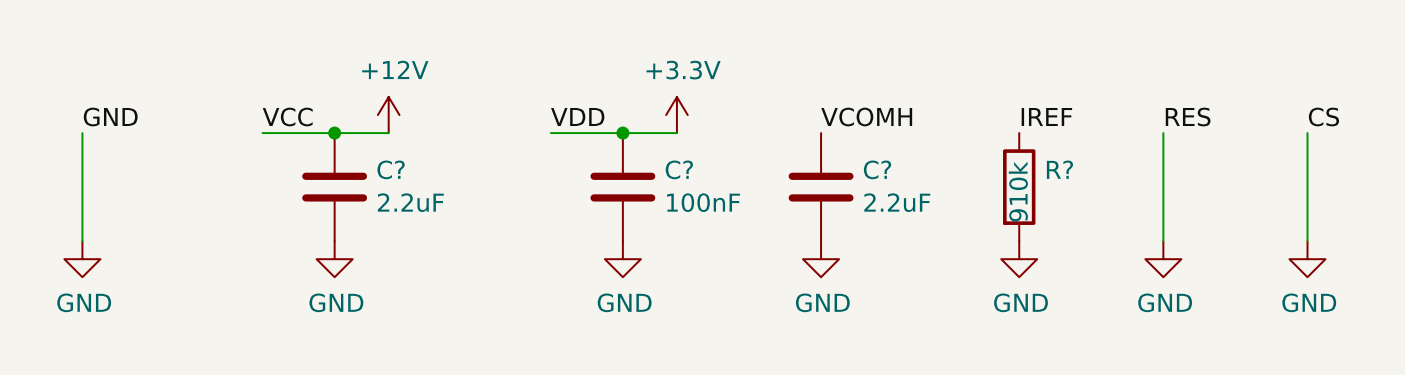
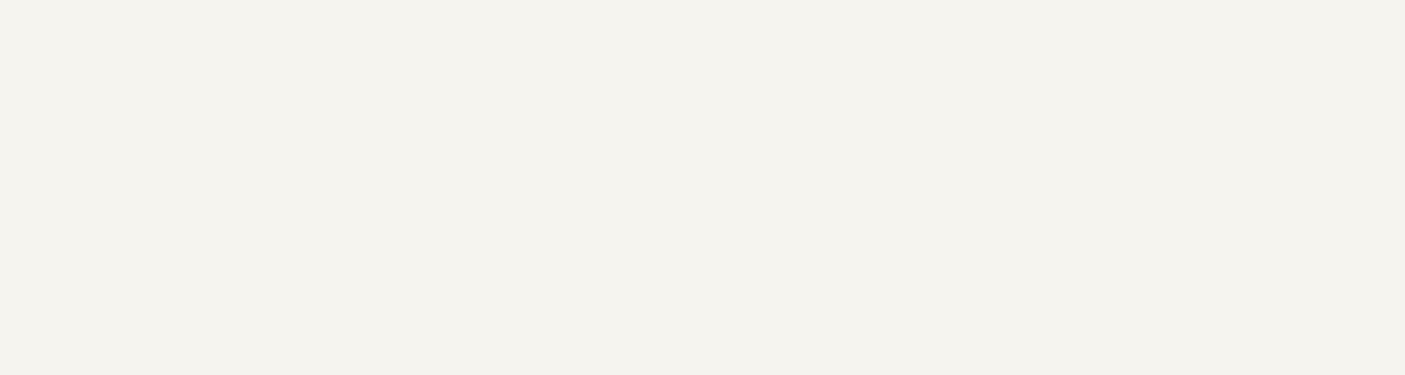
power symbol: +12V (388, 115) -> none
power symbol: +3.3V (676, 115) -> none
label: VDD (577, 116) -> none
label: IREF (1046, 116) -> none
label: GND (110, 117) -> none
label: VCC (287, 117) -> none
label: VCOMH (866, 117) -> none
label: RES (1188, 117) -> none
label: CS (1323, 117) -> none
wire: (82, 133) (82, 241) -> none
wire: (262, 133) (388, 133) -> none
junction: (334, 133) -> none
wire: (550, 133) (676, 133) -> none
junction: (622, 133) -> none
wire: (1163, 133) (1163, 241) -> none
wire: (1307, 133) (1307, 241) -> none
C?: 2.2uF (334, 187) -> none
C?: 100nF (622, 187) -> none
C?: 2.2uF (821, 187) -> none
R?: 910k (1019, 187) -> none
power symbol: GND (82, 259) -> none
power symbol: GND (334, 259) -> none
power symbol: GND (622, 259) -> none
power symbol: GND (821, 259) -> none
power symbol: GND (1019, 259) -> none
power symbol: GND (1163, 259) -> none
power symbol: GND (1307, 259) -> none

